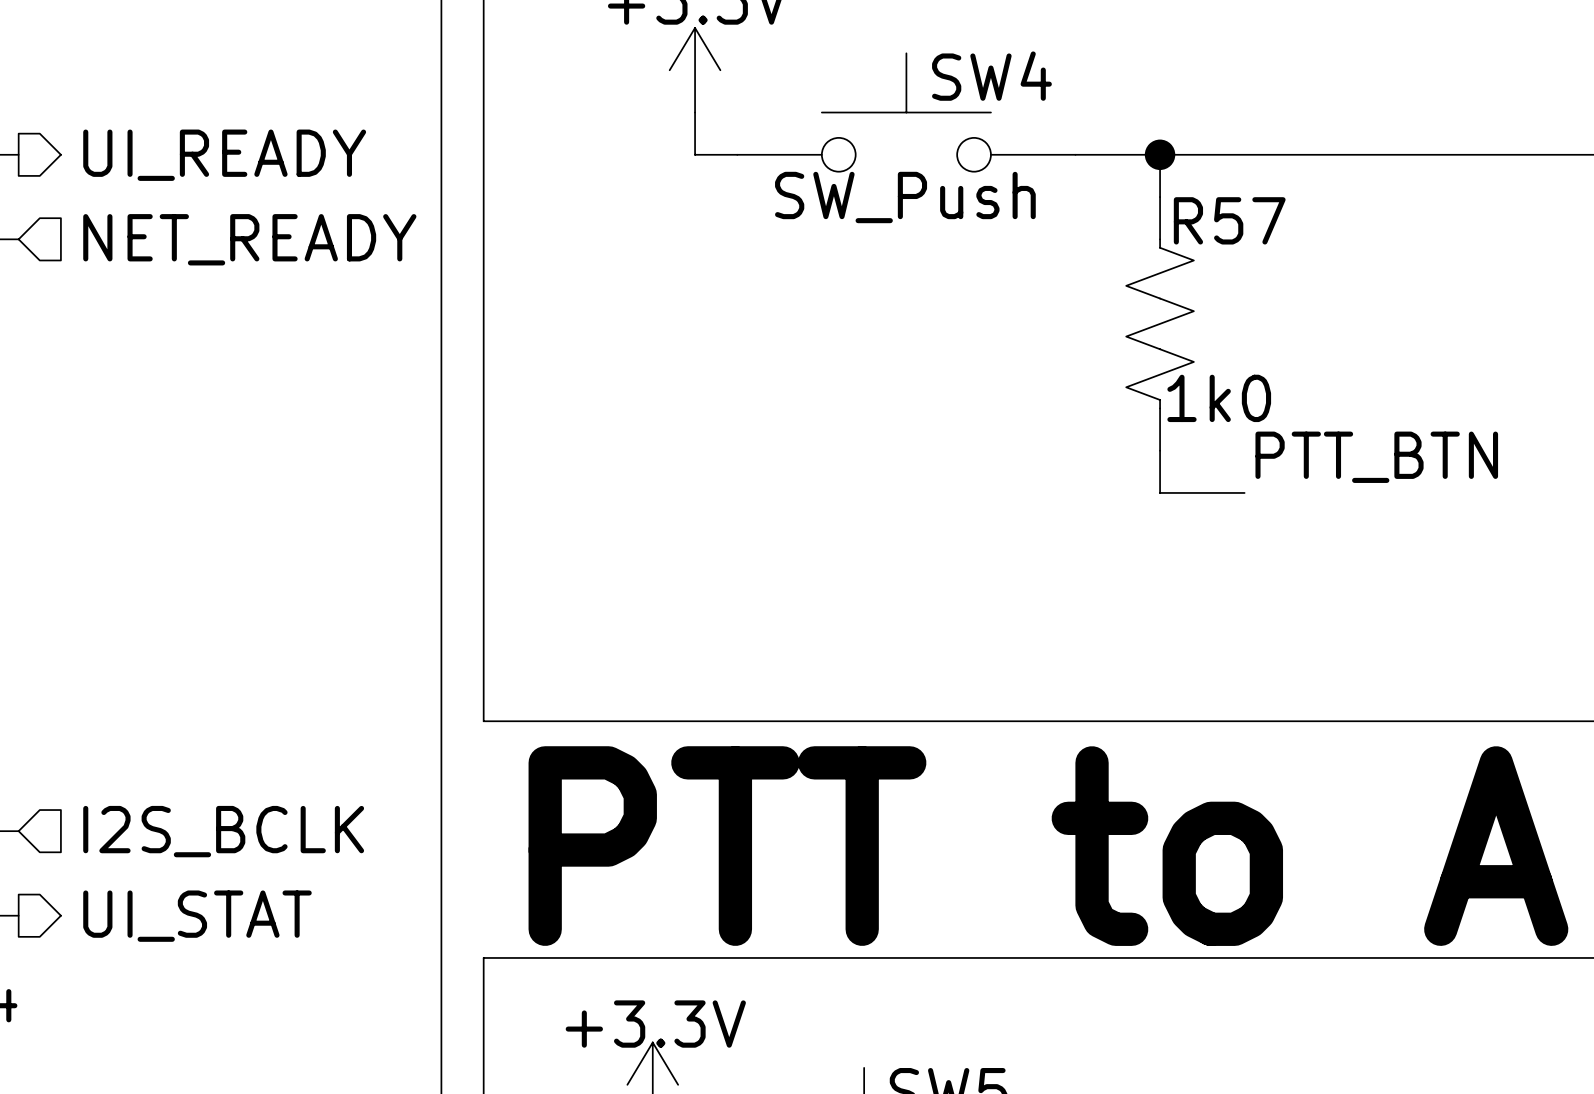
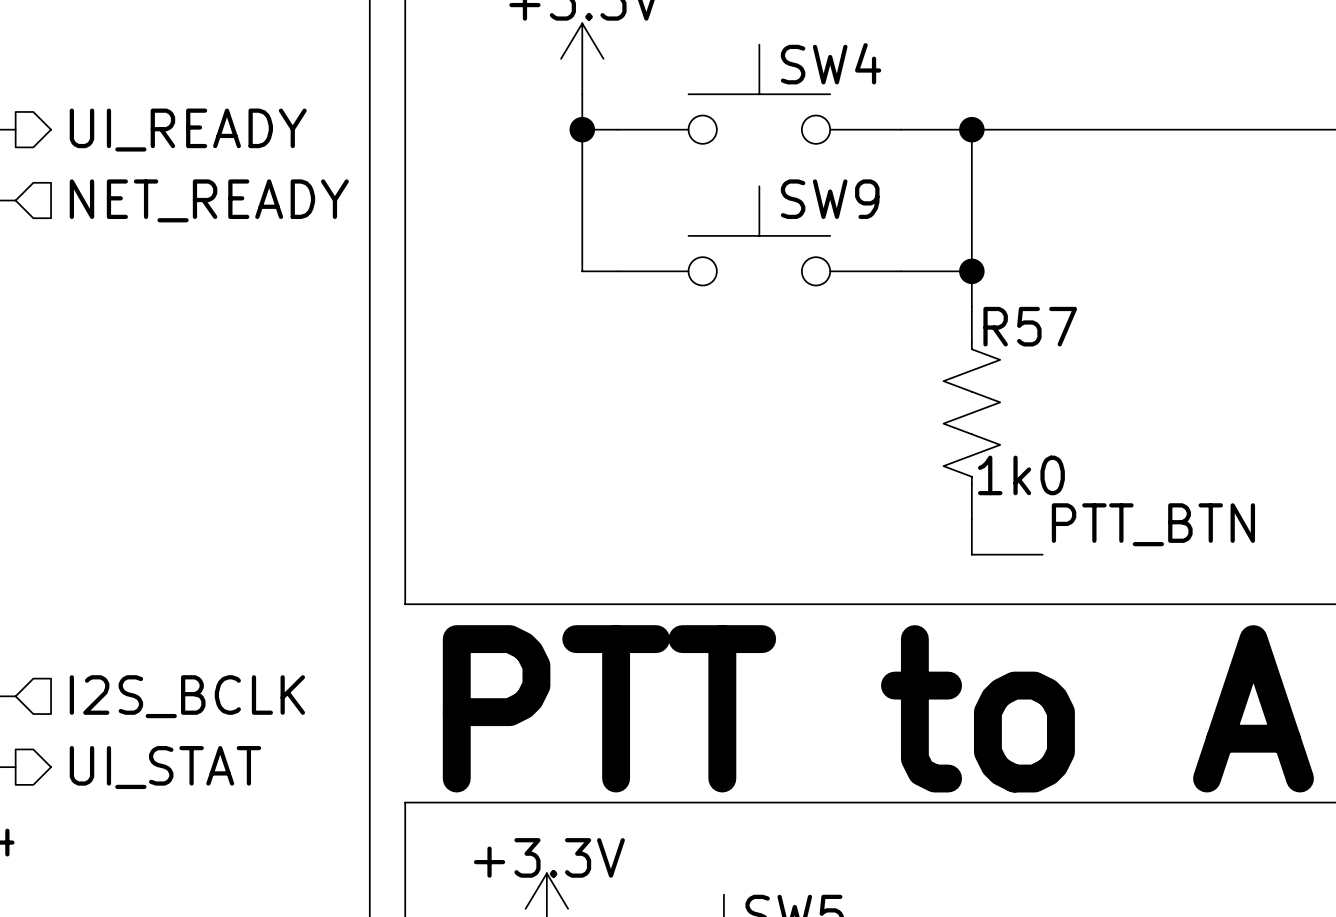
wire: none -> (582, 129) (582, 271) (617, 271)
junction: none -> (582, 129)
SW4 value: SW_Push (905, 197) -> none
wire: none -> (971, 165) (971, 306)
SW9: none -> (759, 235)
wire: none -> (901, 271) (971, 271)
R57 position: (1160, 323) -> (971, 413)
junction: none -> (971, 271)
wire: (1160, 450) (1160, 492) (1244, 492) -> (971, 519) (971, 554) (1042, 554)
label position: PTT_BTN (1376, 457) -> PTT_BTN (1153, 524)

